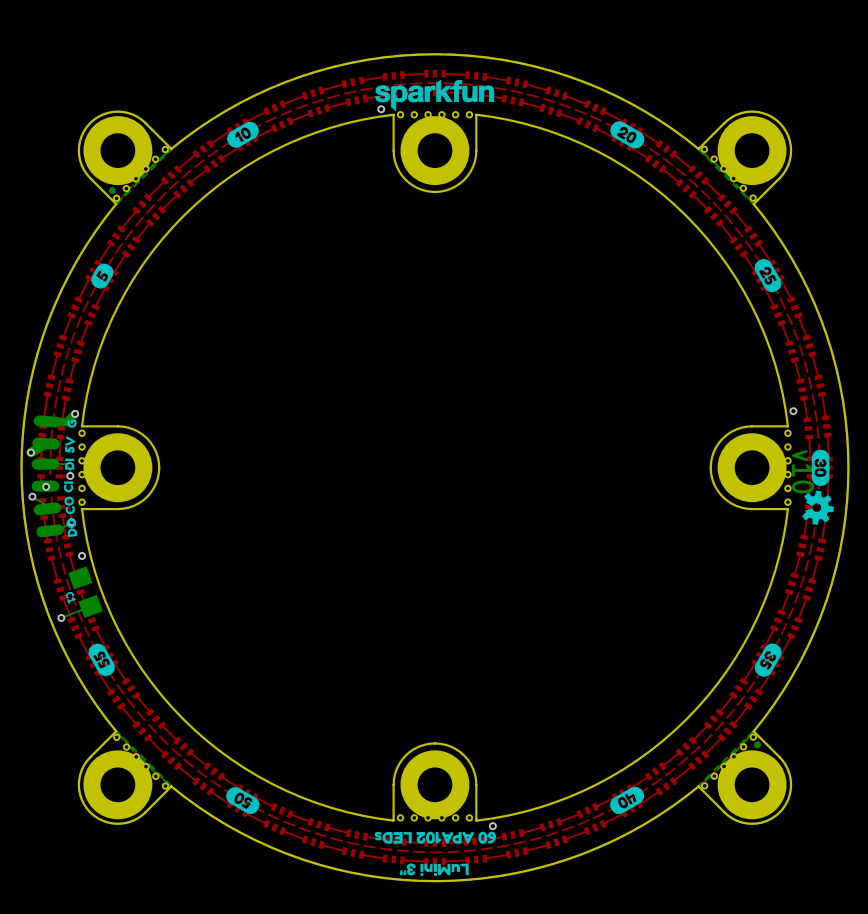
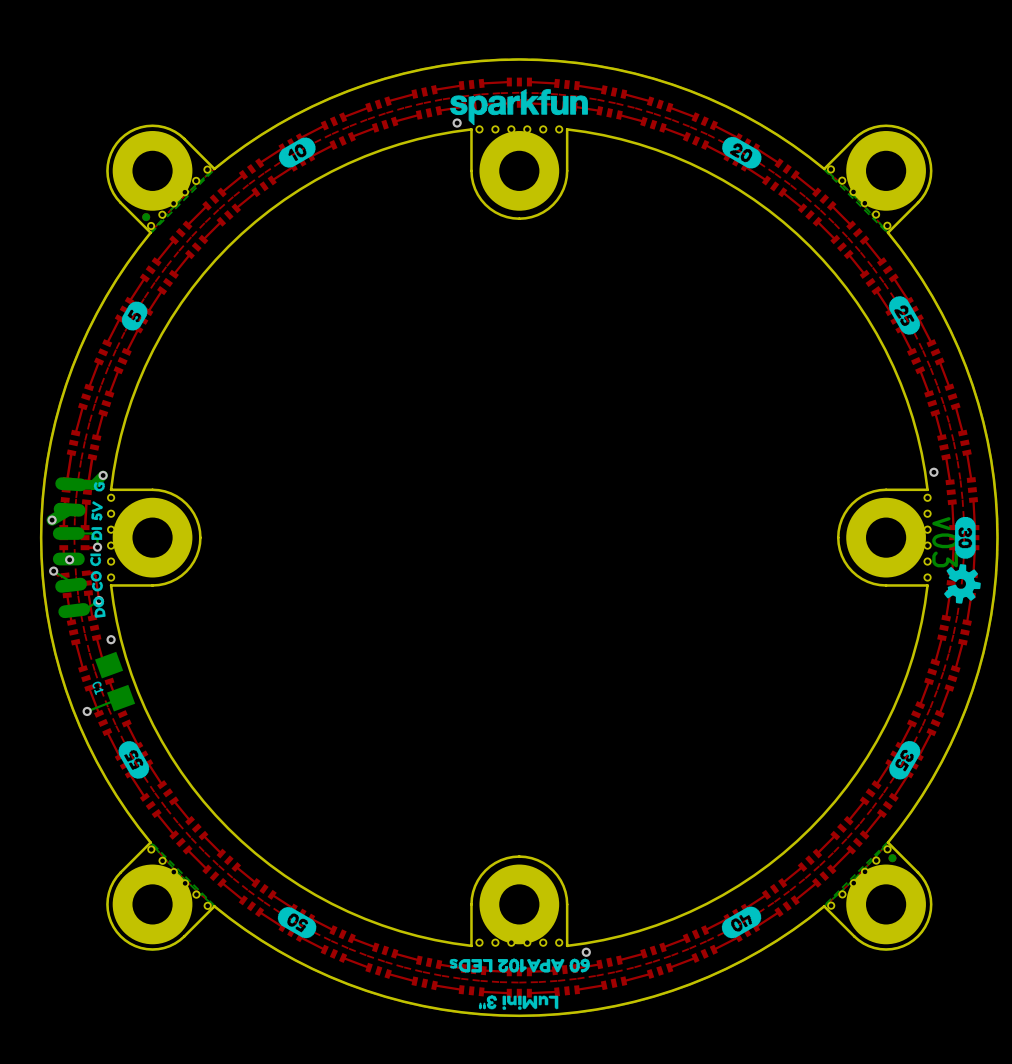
text: v10 (803, 471) -> v03 (945, 542)

